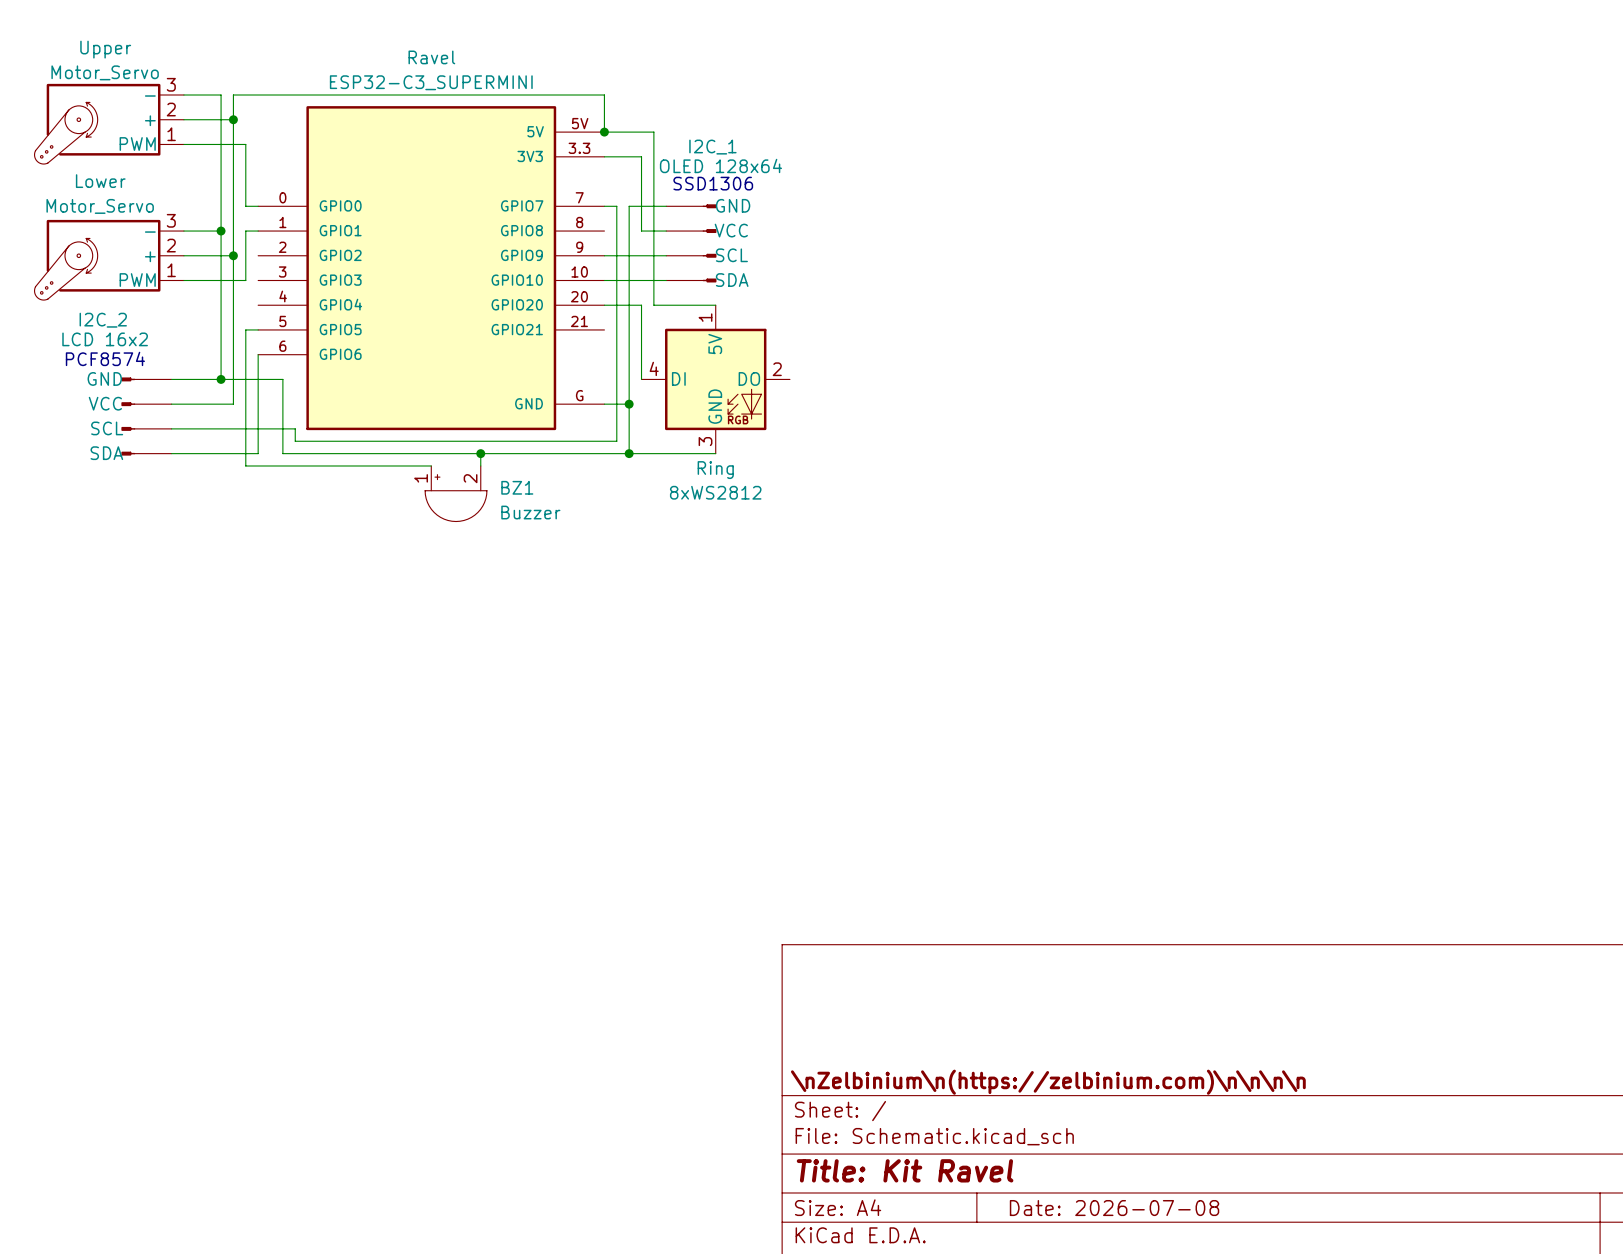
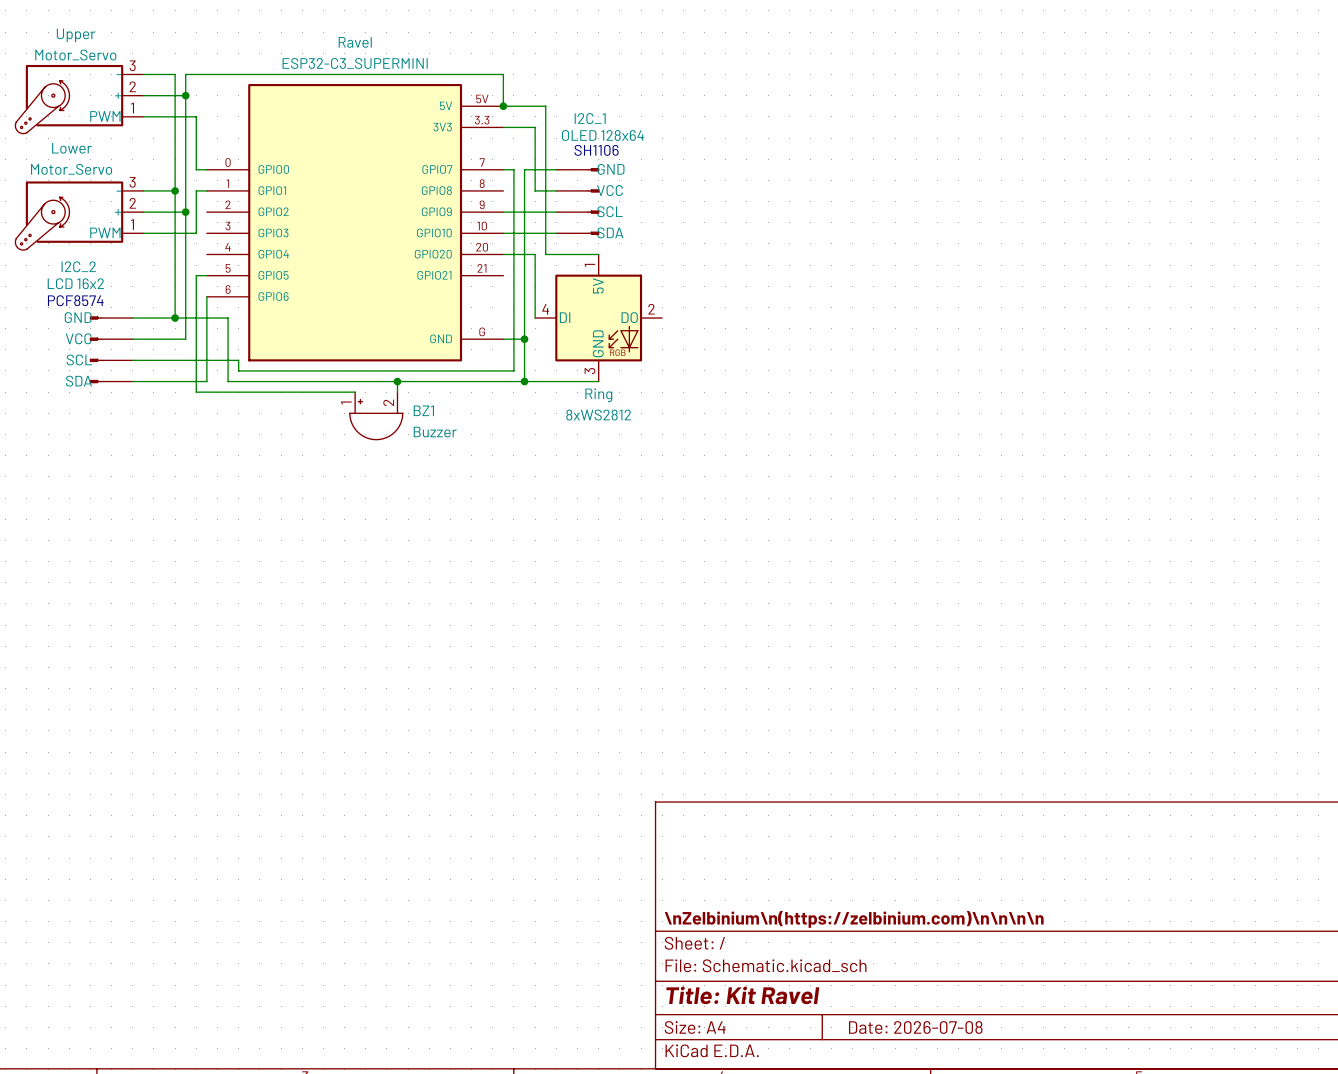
text: SSD1306 (713, 183) -> SH1106 (596, 150)

